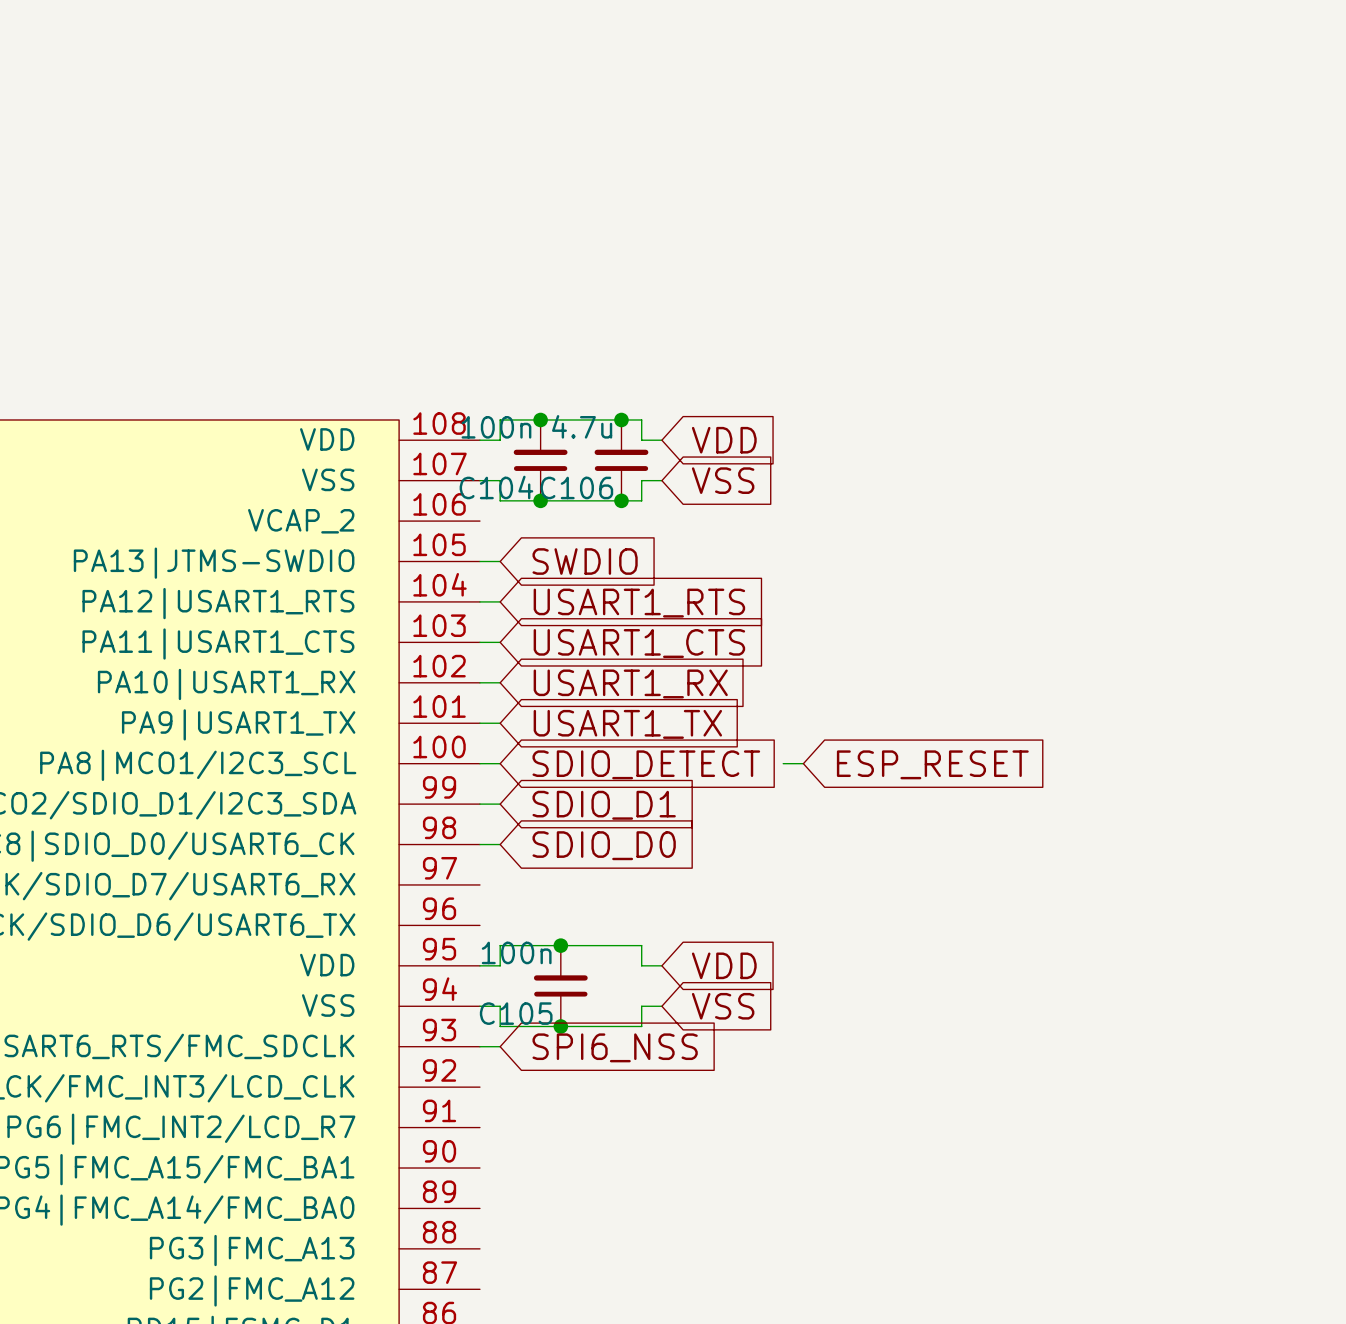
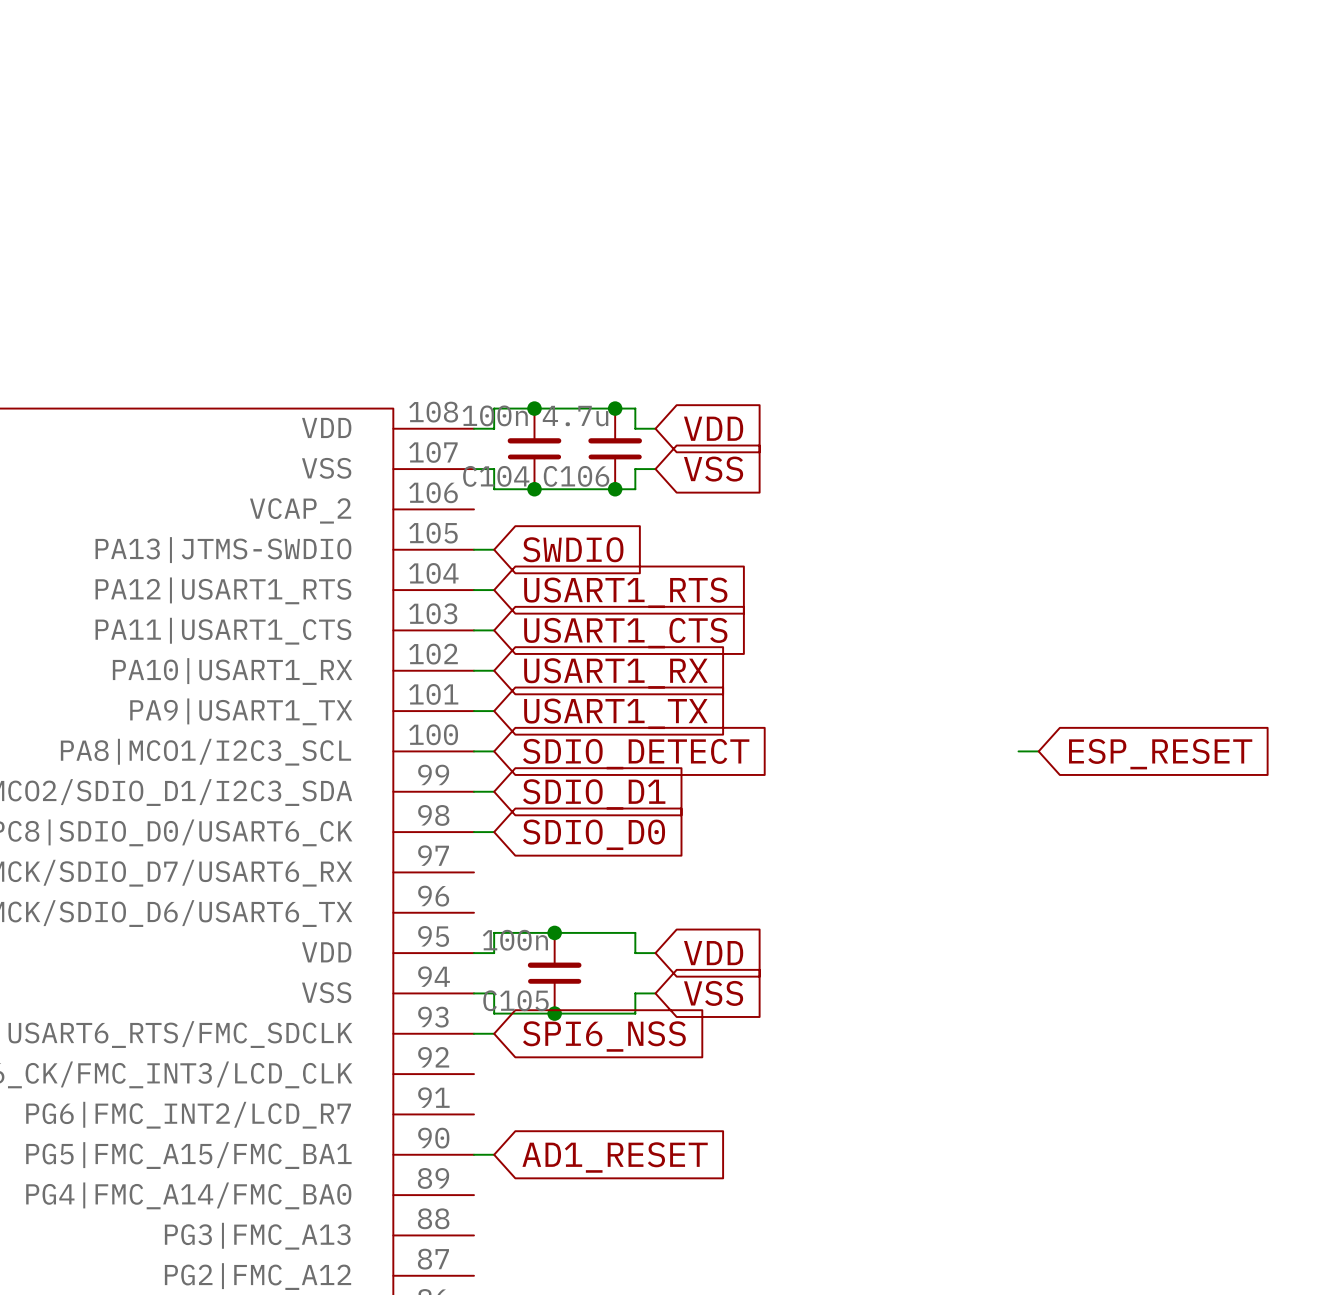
wire: (783, 763) (803, 763) -> (1018, 751) (1038, 751)
global label position: ESP_RESET (932, 764) -> ESP_RESET (1160, 754)
wire: none -> (473, 1154) (494, 1154)
global label: none -> AD1_RESET (615, 1157)

